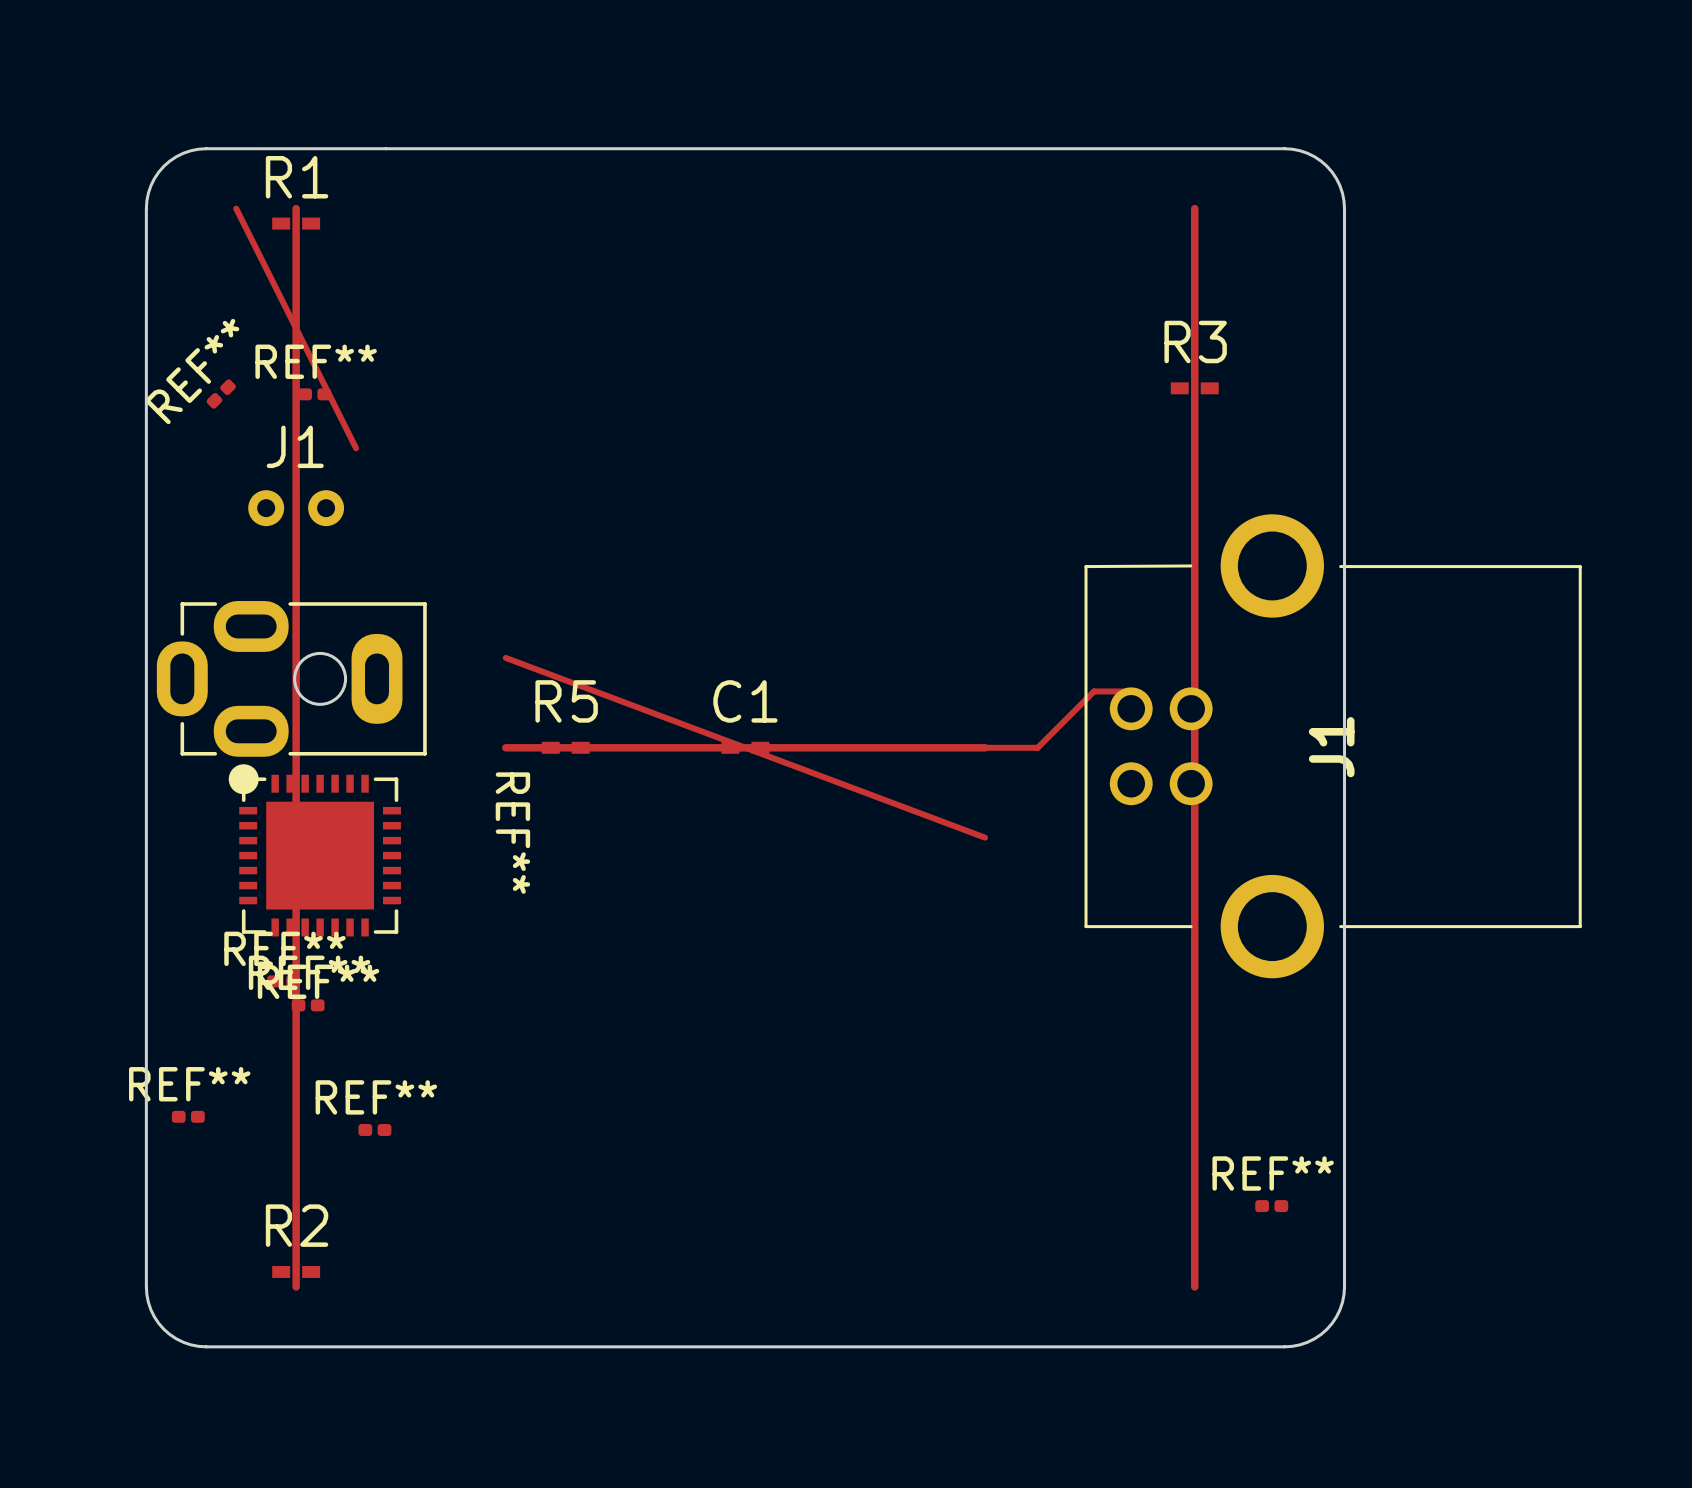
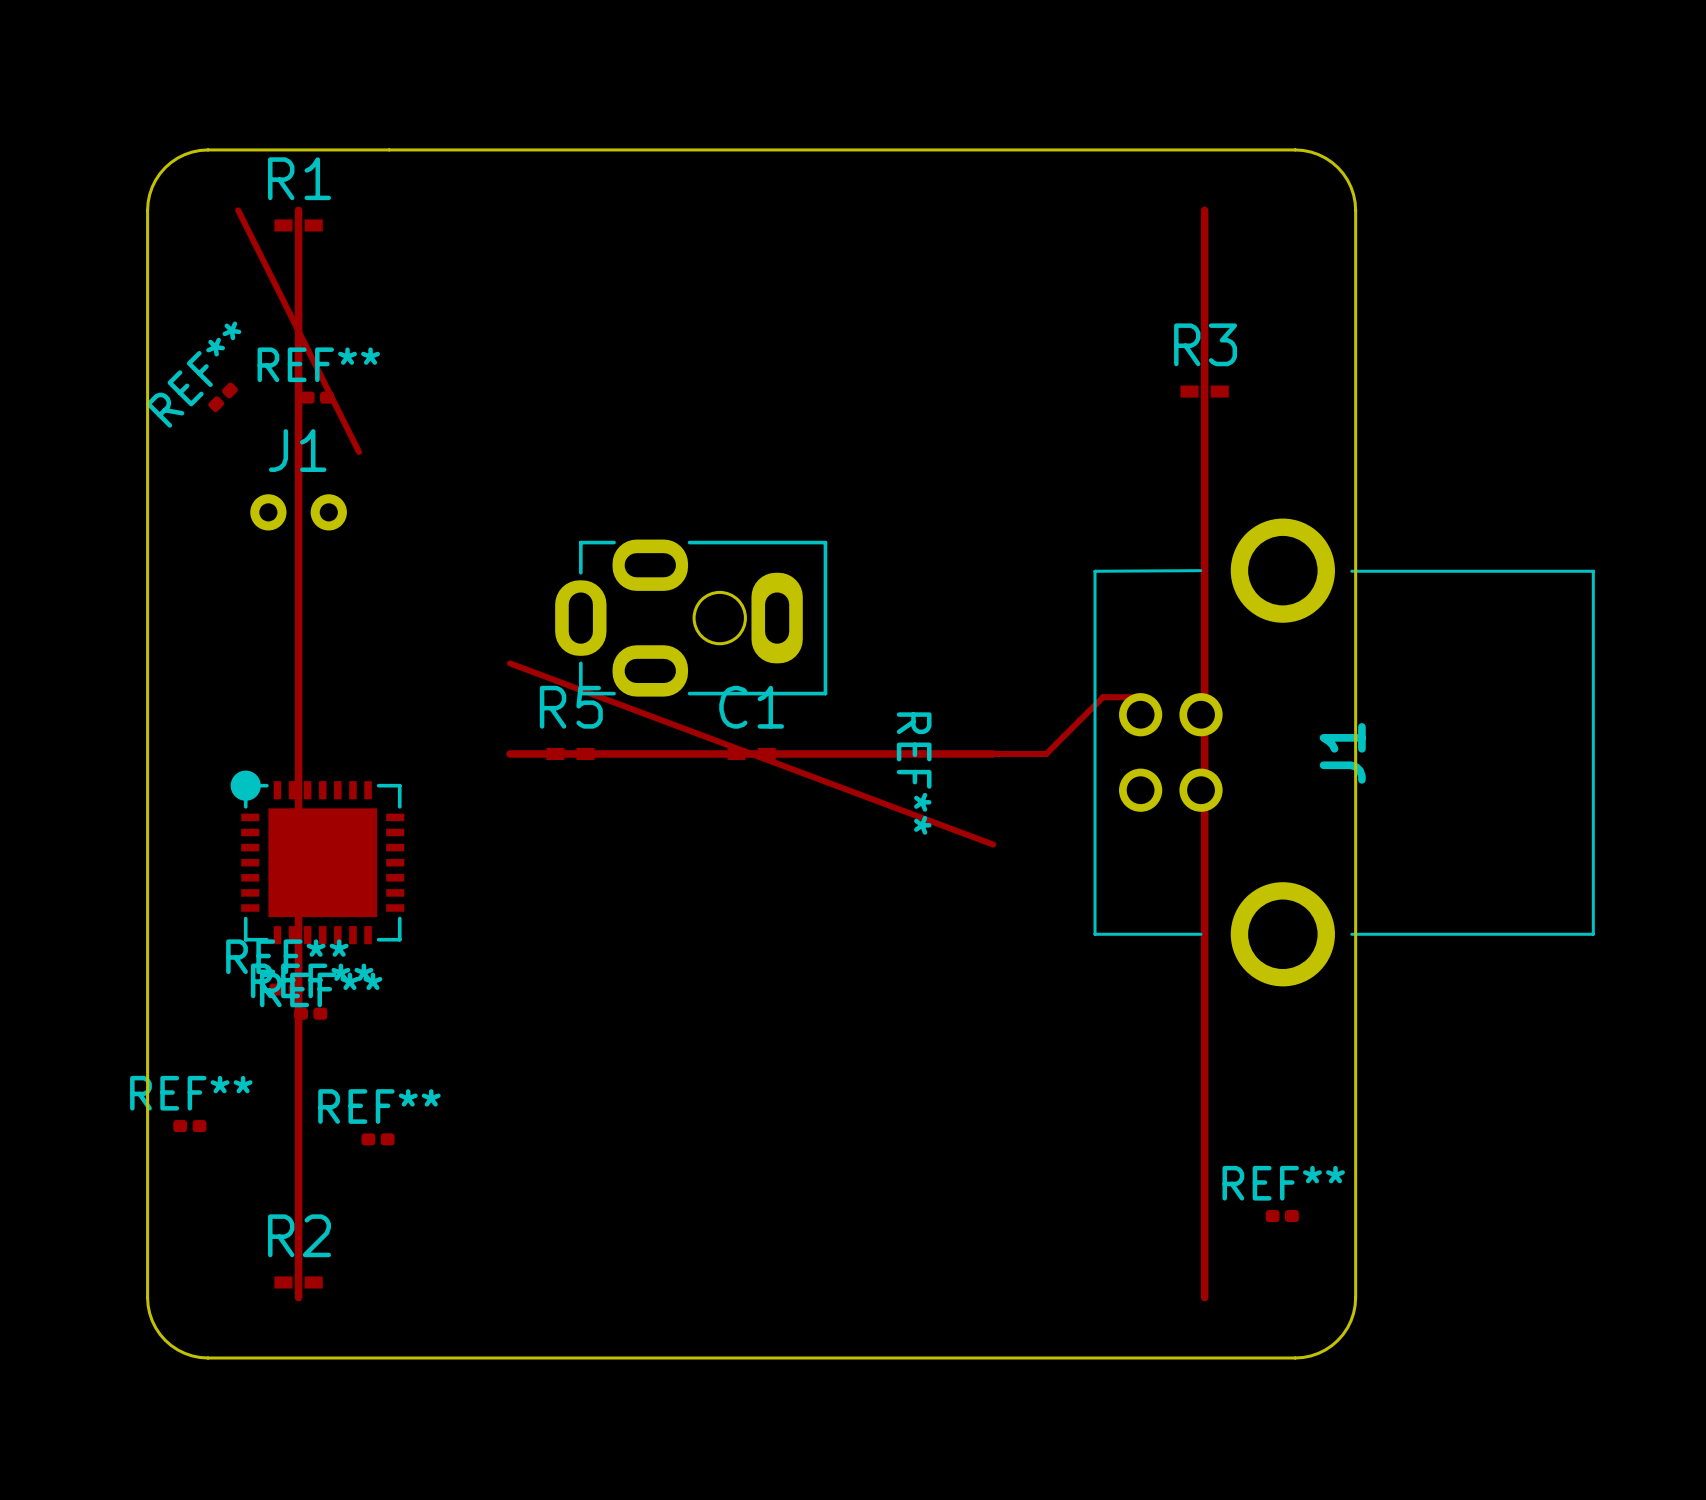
REF** position: (291, 678) -> (691, 618)

